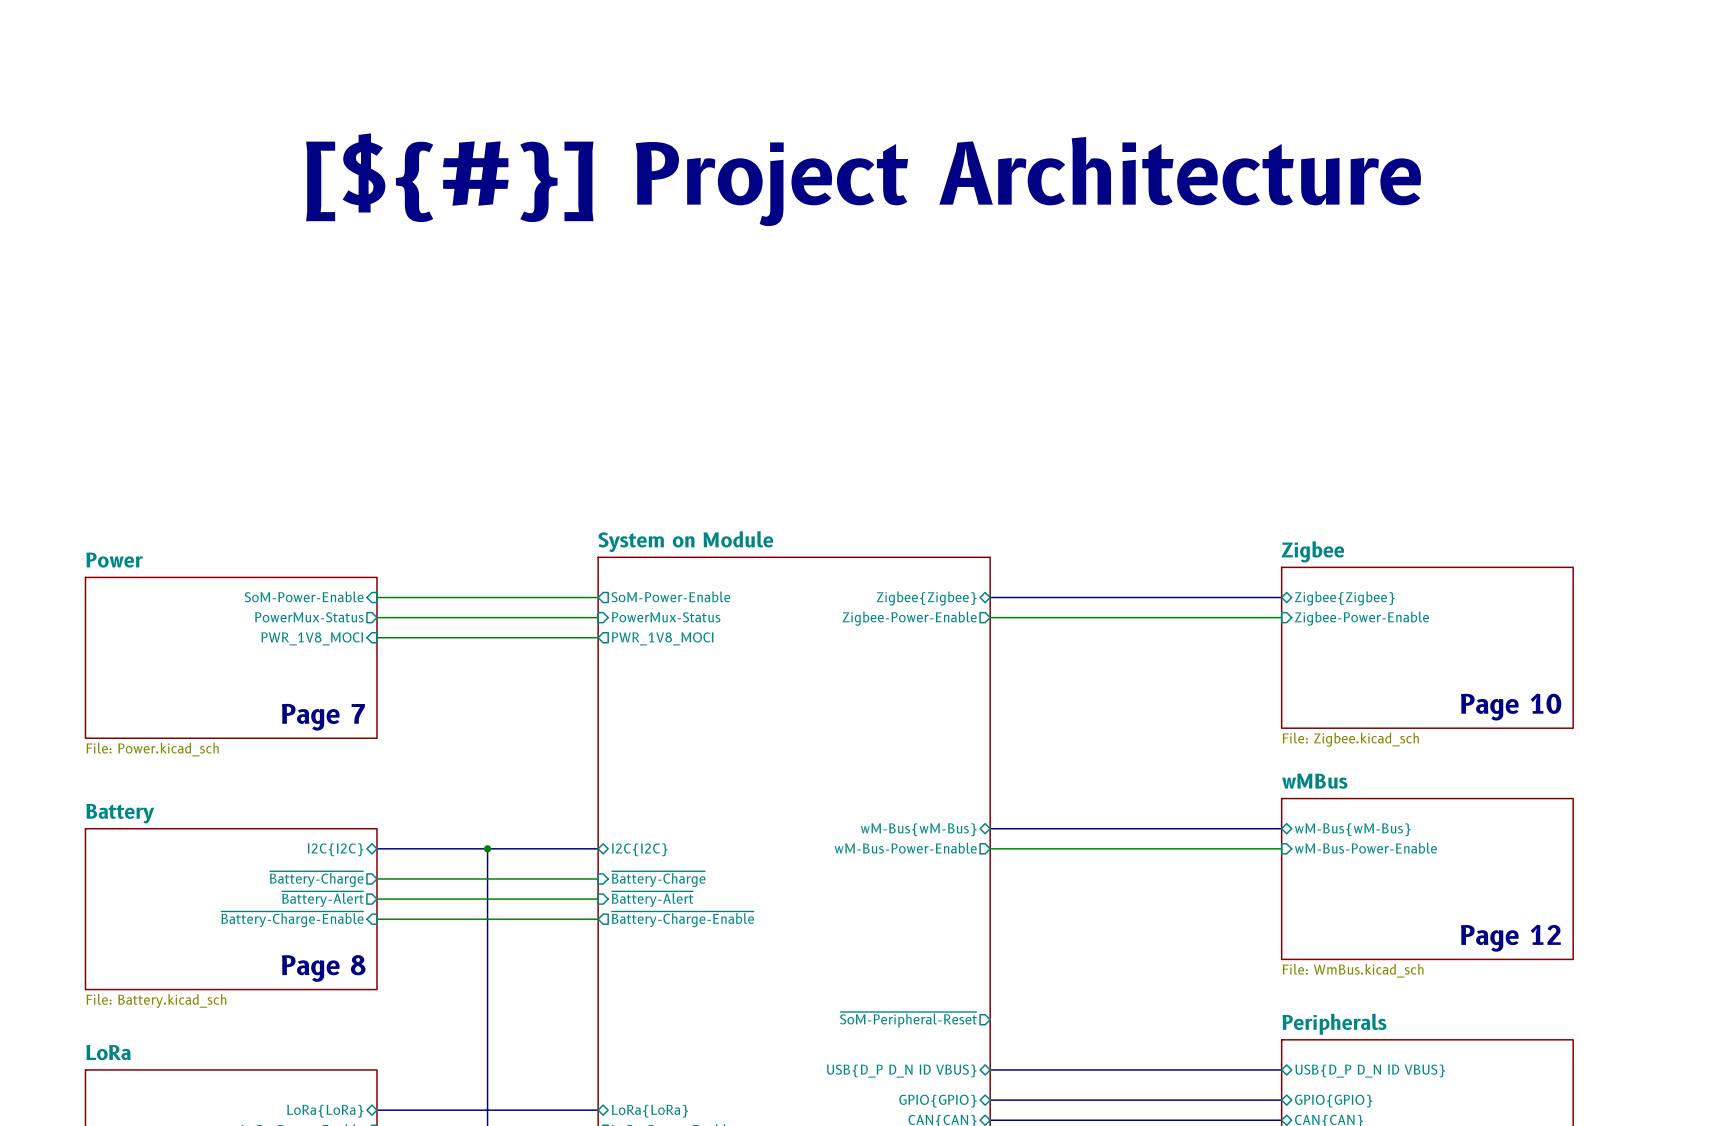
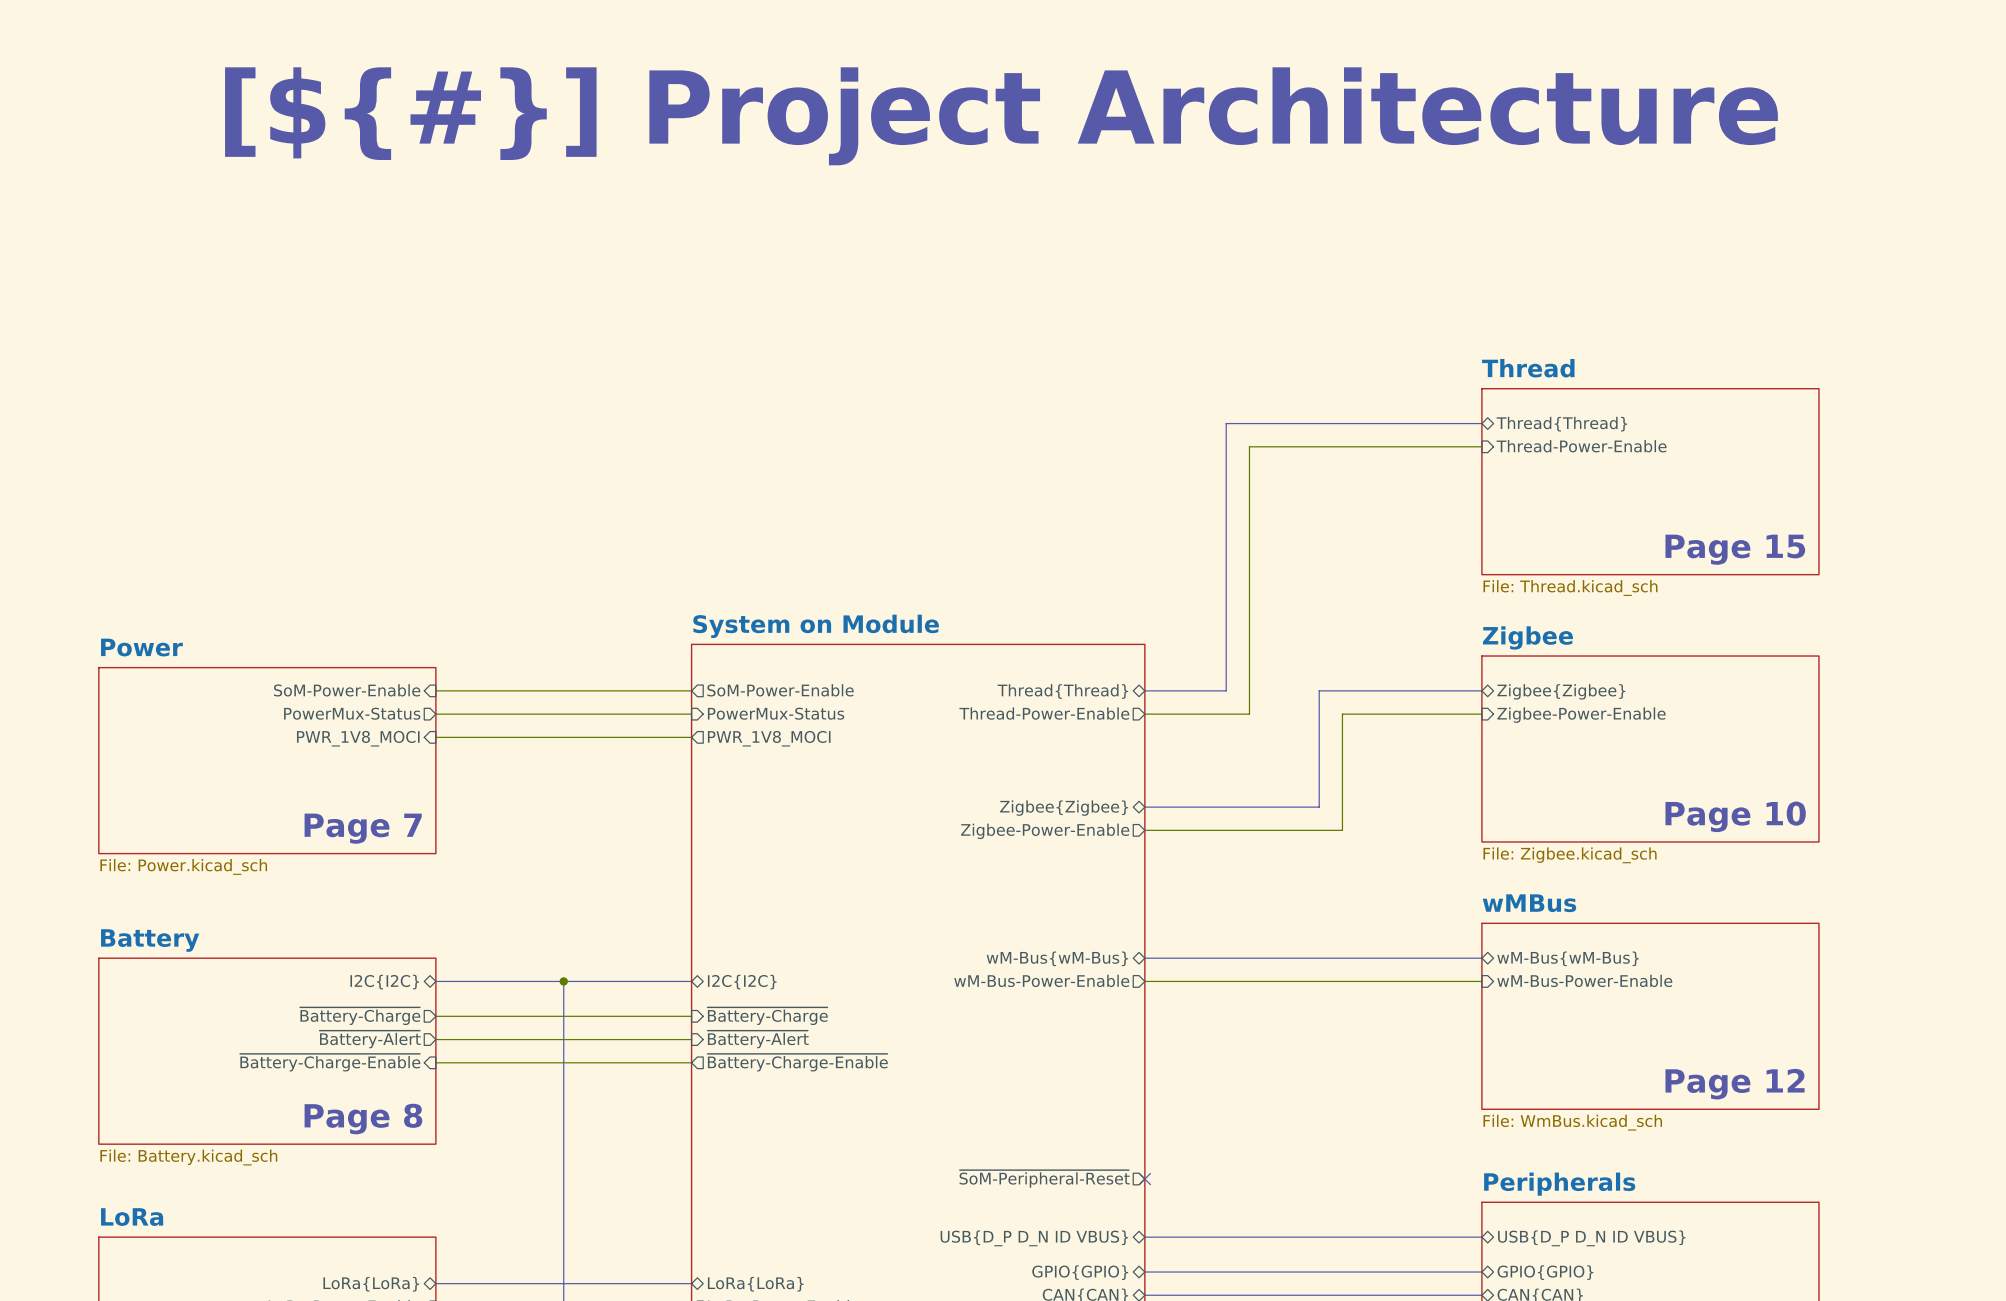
text position: [${#}] Project Architecture (863, 179) -> [${#}] Project Architecture (1001, 116)
bus: none -> (1481, 423) (1226, 423) (1226, 690)
sheet pin: none -> Thread{Thread} (1561, 424)
sheet pin: none -> Thread-Power-Enable (1581, 446)
wire: none -> (1481, 446) (1249, 446) (1249, 714)
sheet Thread: none -> File: Thread.kicad_sch (1650, 481)
text: none -> Page 15 (1735, 549)
bus: (1060, 597) (1140, 597) -> (1144, 807) (1319, 807) (1319, 690)
sheet pin: Zigbee{Zigbee} (926, 598) -> Thread{Thread} (1062, 691)
wire: (1080, 617) (1161, 617) -> (1144, 830) (1342, 830) (1342, 714)
sheet pin: Zigbee-Power-Enable (909, 618) -> Thread-Power-Enable (1044, 713)
sheet pin: none -> Zigbee{Zigbee} (1064, 808)
sheet pin: none -> Zigbee-Power-Enable (1045, 831)
no-connect mark: none -> (1144, 1179)

